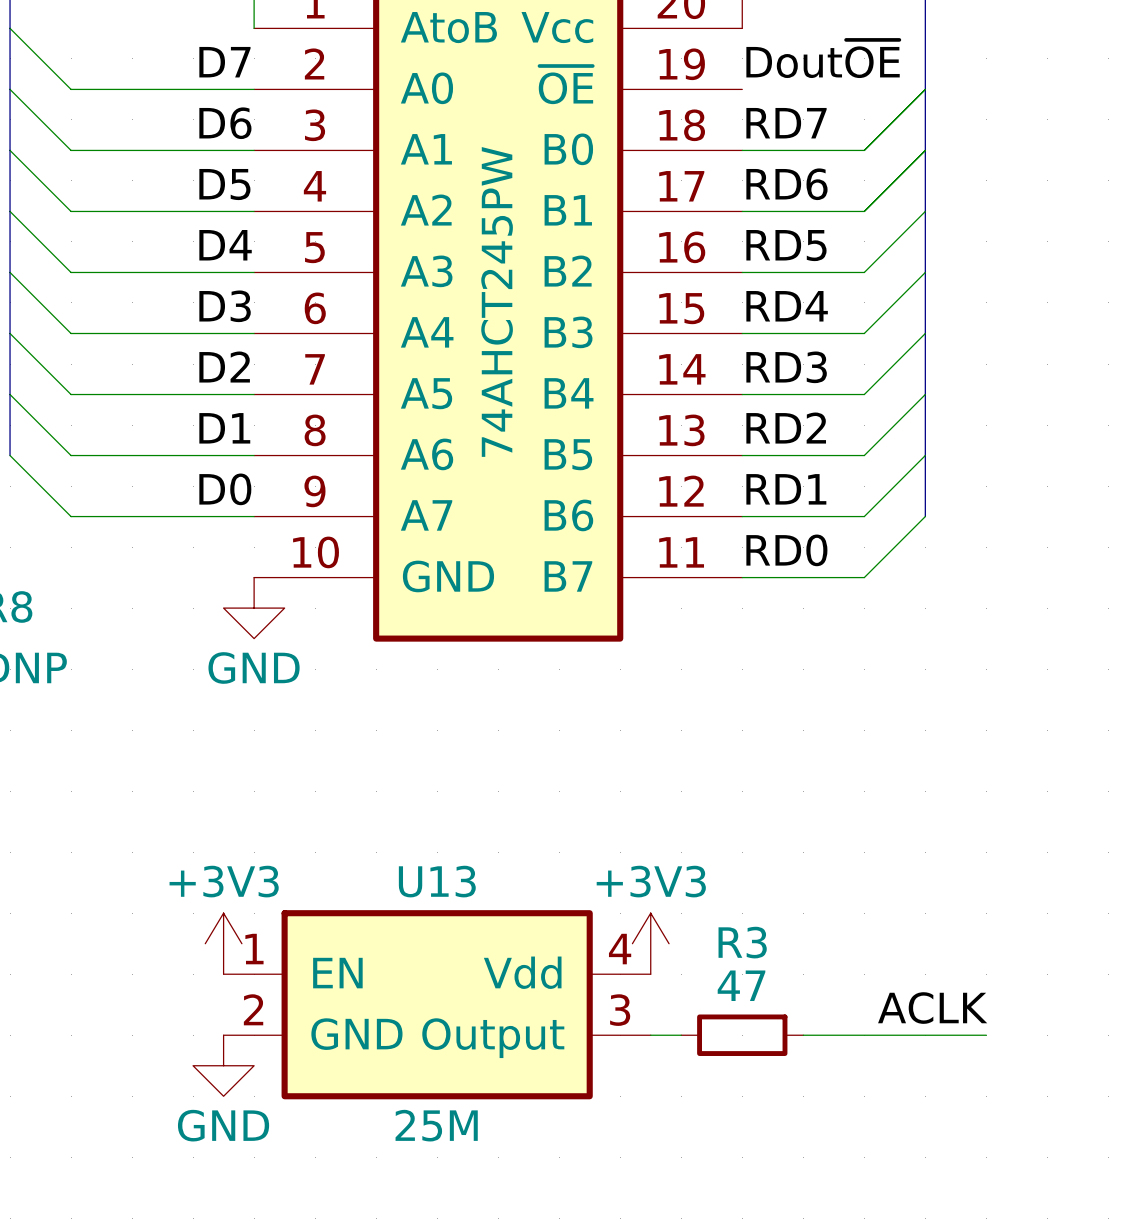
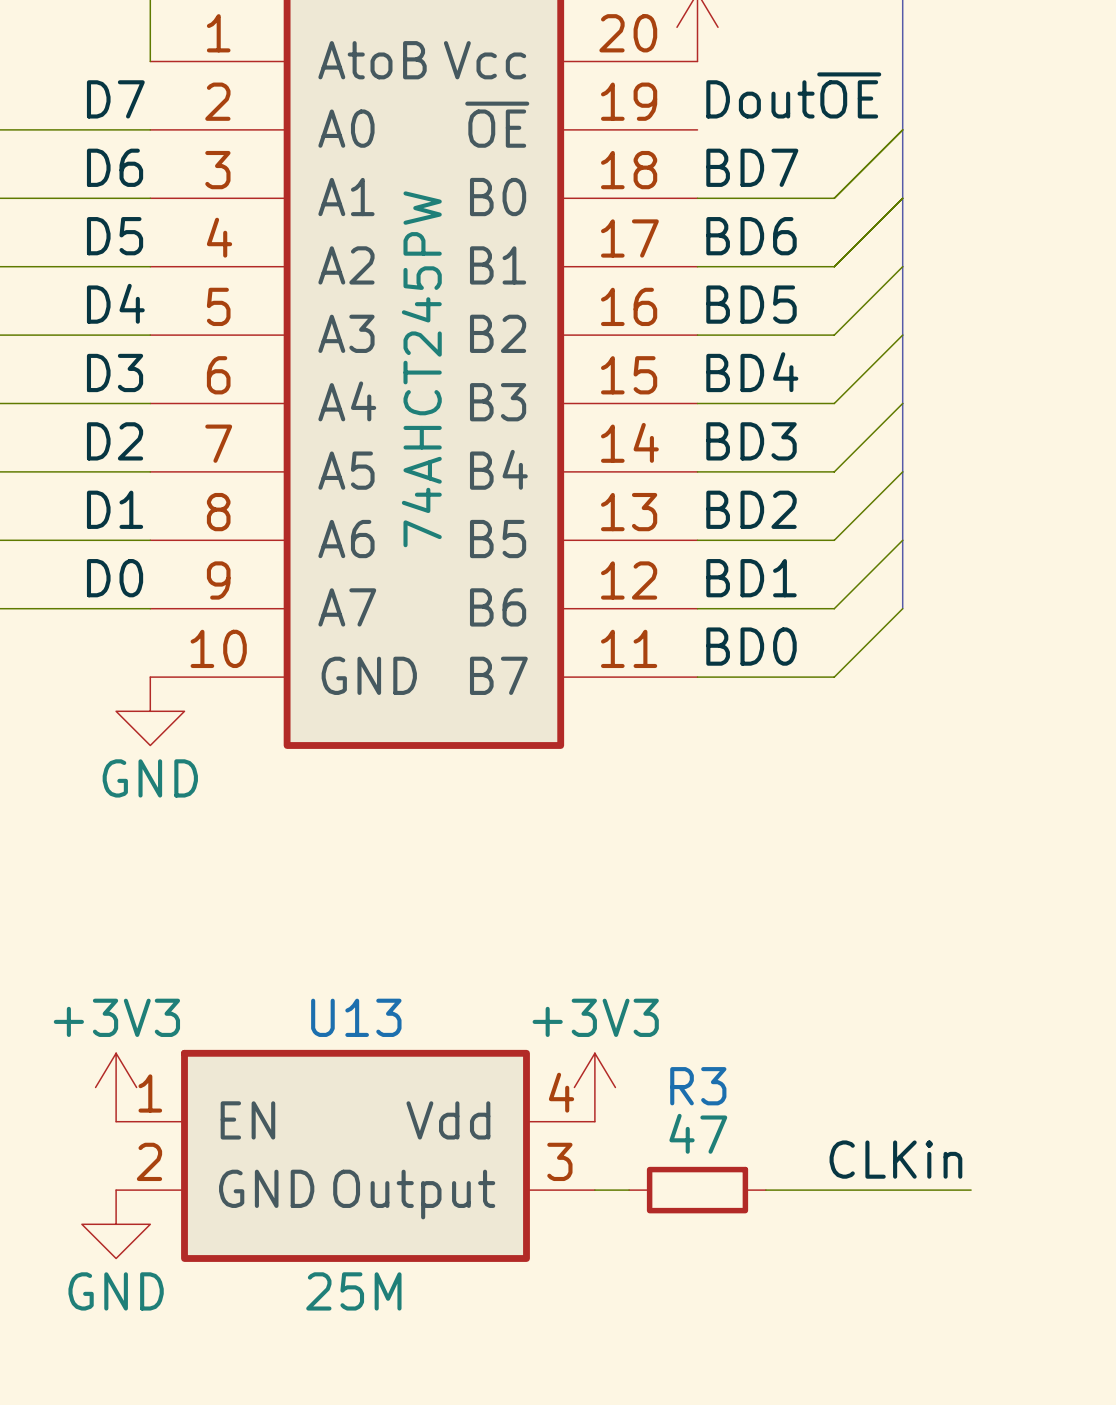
label: RD7 (786, 123) -> BD7 (752, 167)
label: RD6 (786, 184) -> BD6 (751, 236)
label: RD5 (786, 245) -> BD5 (751, 304)
label: RD4 (787, 306) -> BD4 (752, 372)
label: RD3 (786, 367) -> BD3 (751, 441)
label: RD2 (786, 428) -> BD2 (751, 509)
label: RD1 (786, 489) -> BD1 (751, 578)
label: RD0 (786, 550) -> BD0 (751, 646)
label: ACLK (932, 1008) -> CLKin (895, 1159)

